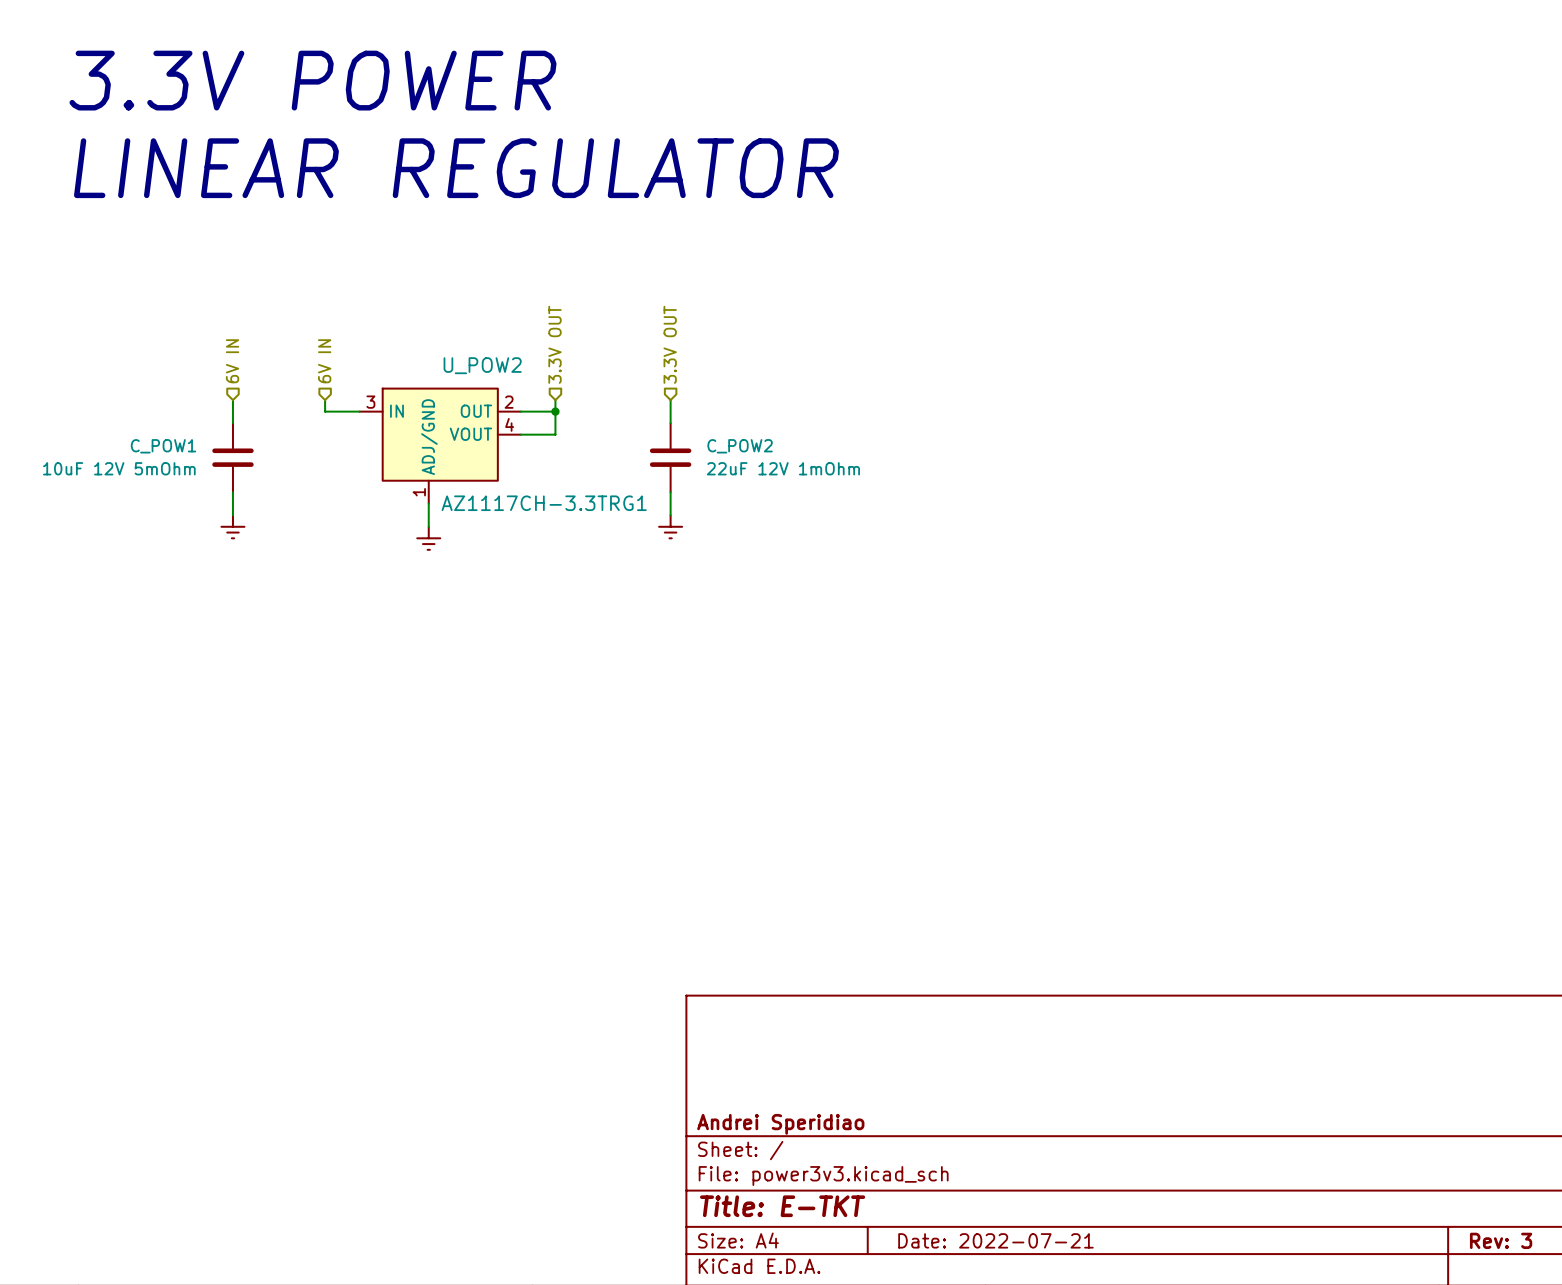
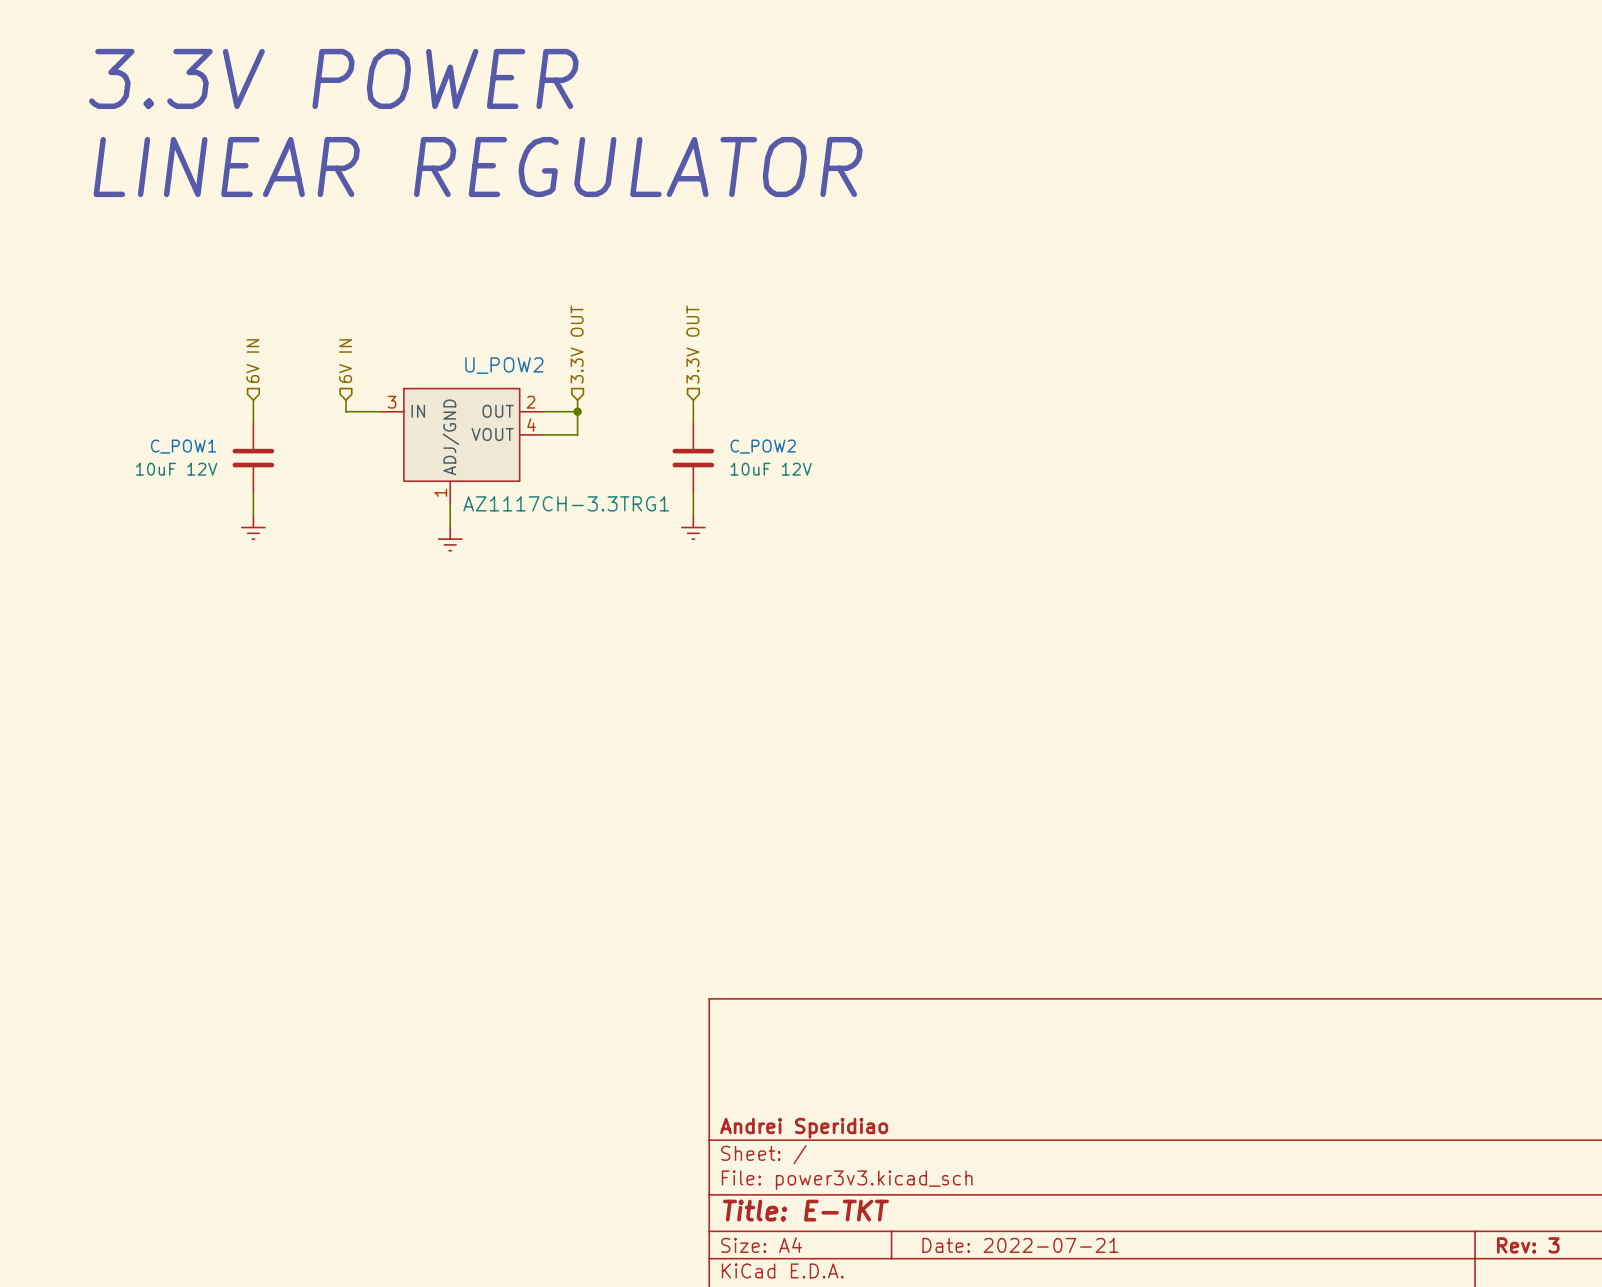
C_POW1 value: 10uF 12V 5mOhm (119, 468) -> 10uF 12V (176, 469)
C_POW2 value: 22uF 12V 1mOhm (783, 468) -> 10uF 12V (771, 469)

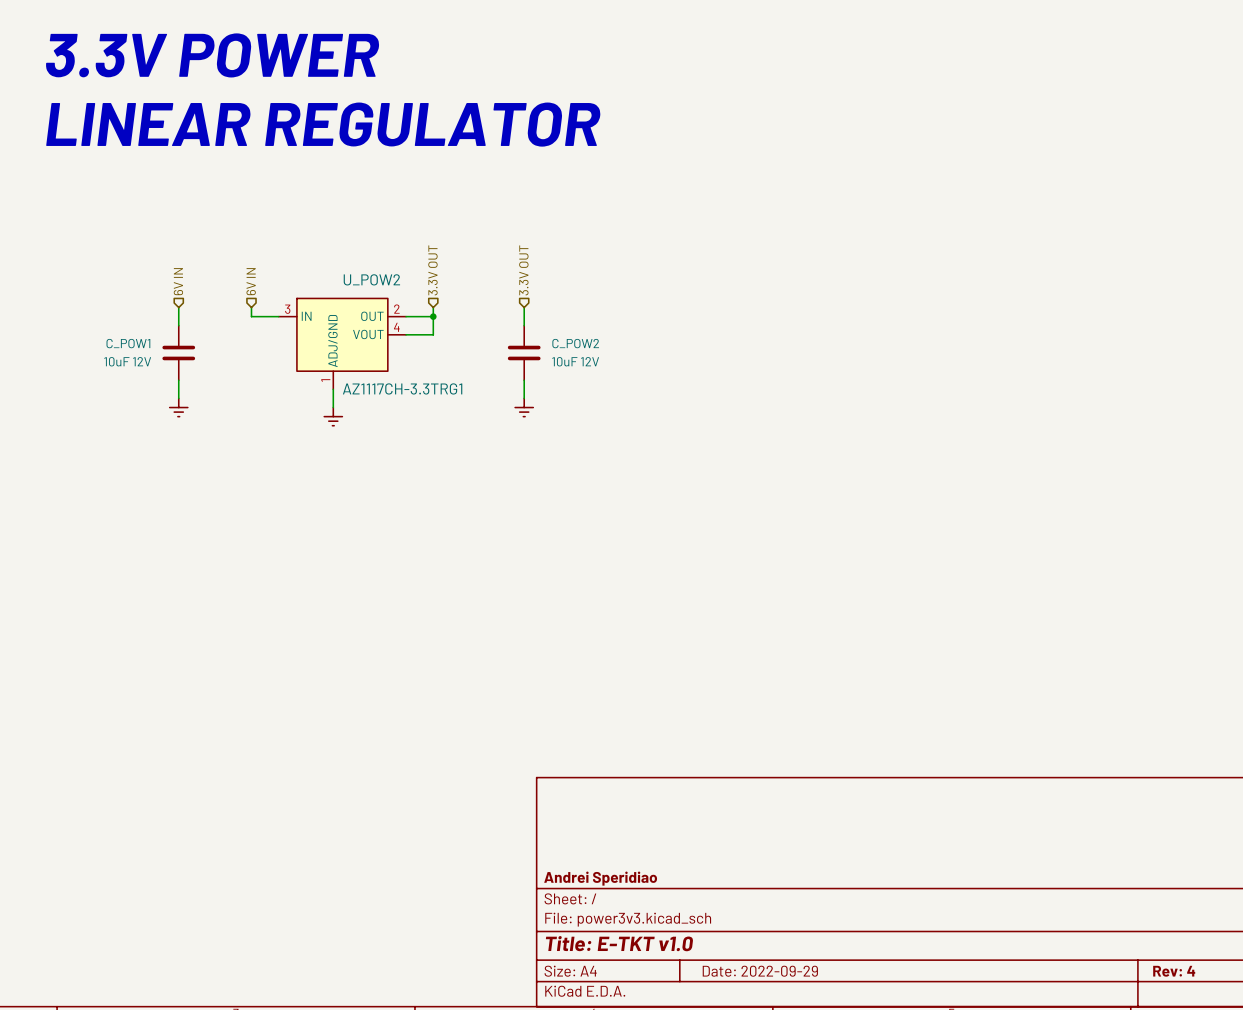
title block: Title: E-TKT (805, 1210) -> Title: E-TKT v1.0 (619, 943)
title block: Date: 2022-07-21 (1020, 1245) -> Date: 2022-09-29 (760, 971)
title block: Rev: 3 (1528, 1245) -> Rev: 4 (1174, 971)

